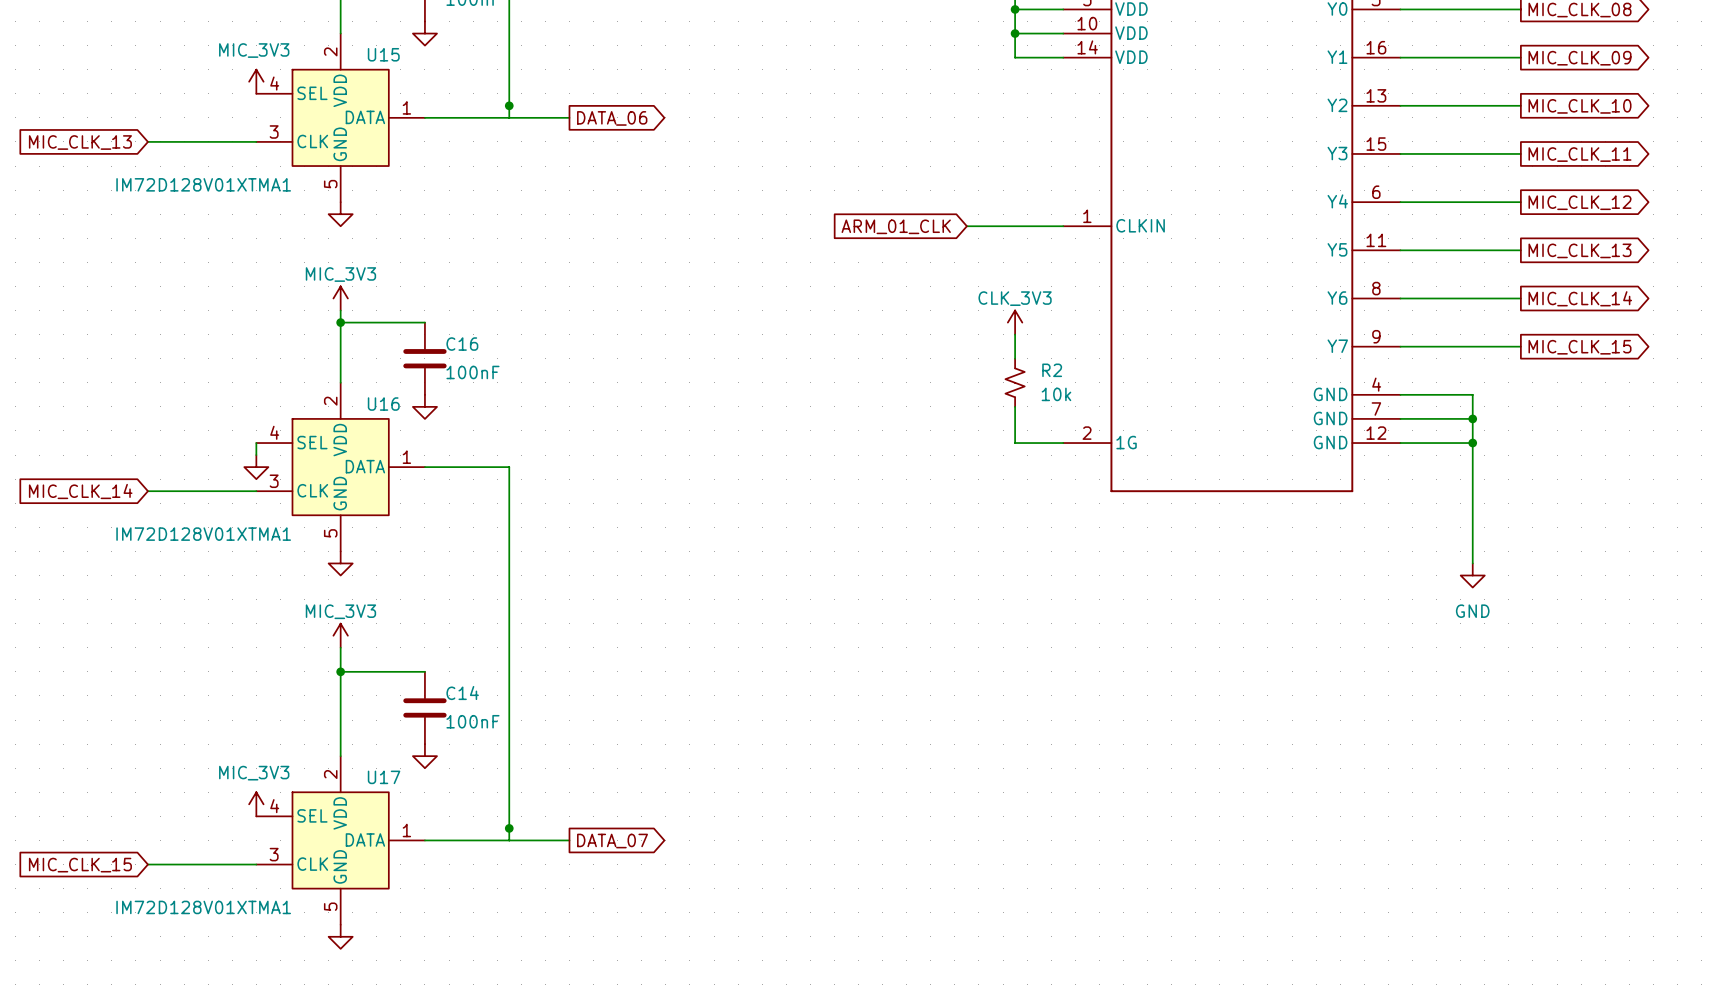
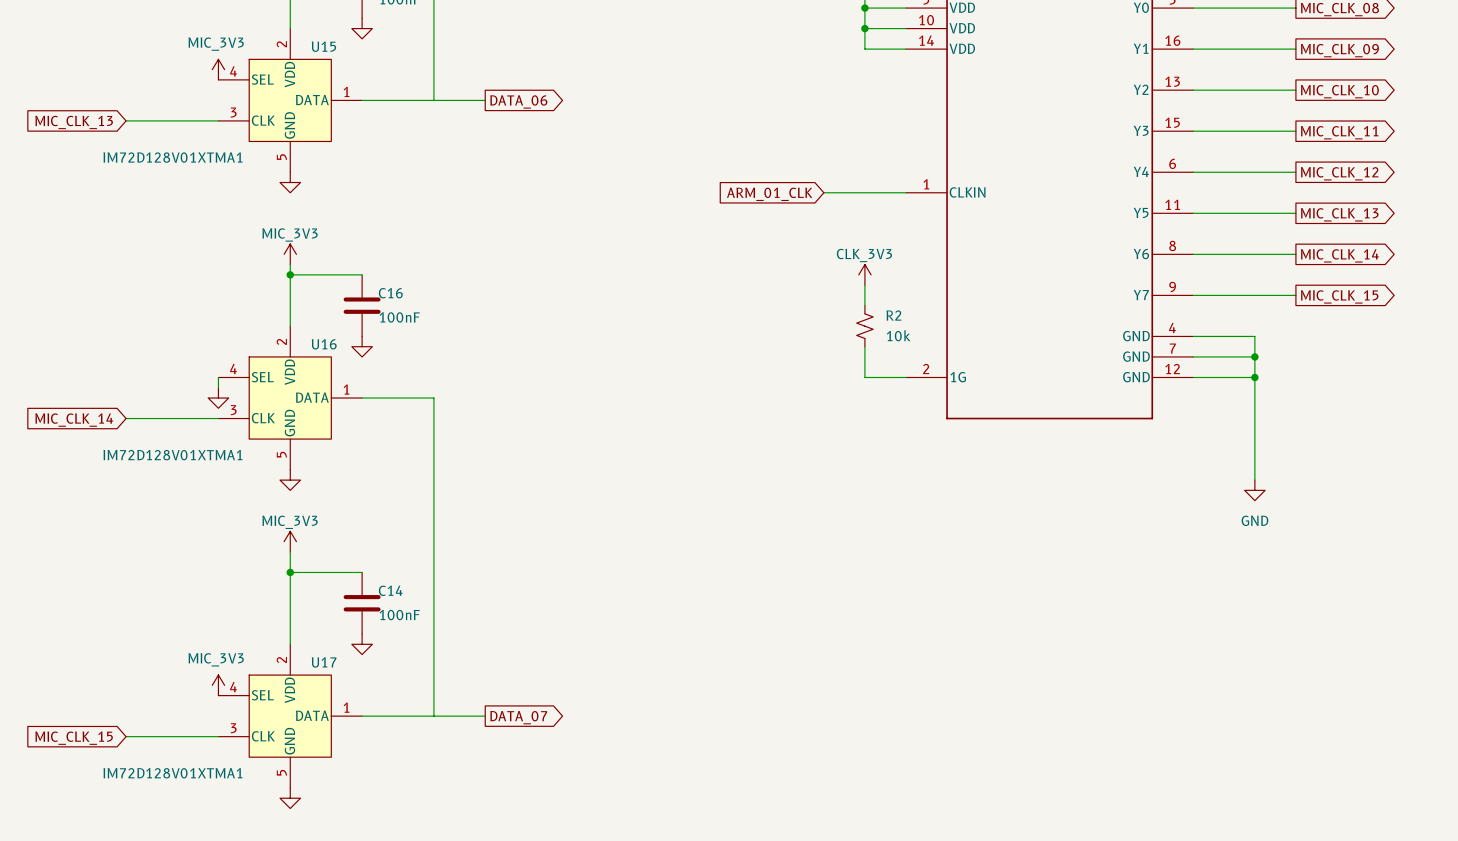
junction: (509, 105) -> none
junction: (509, 828) -> none

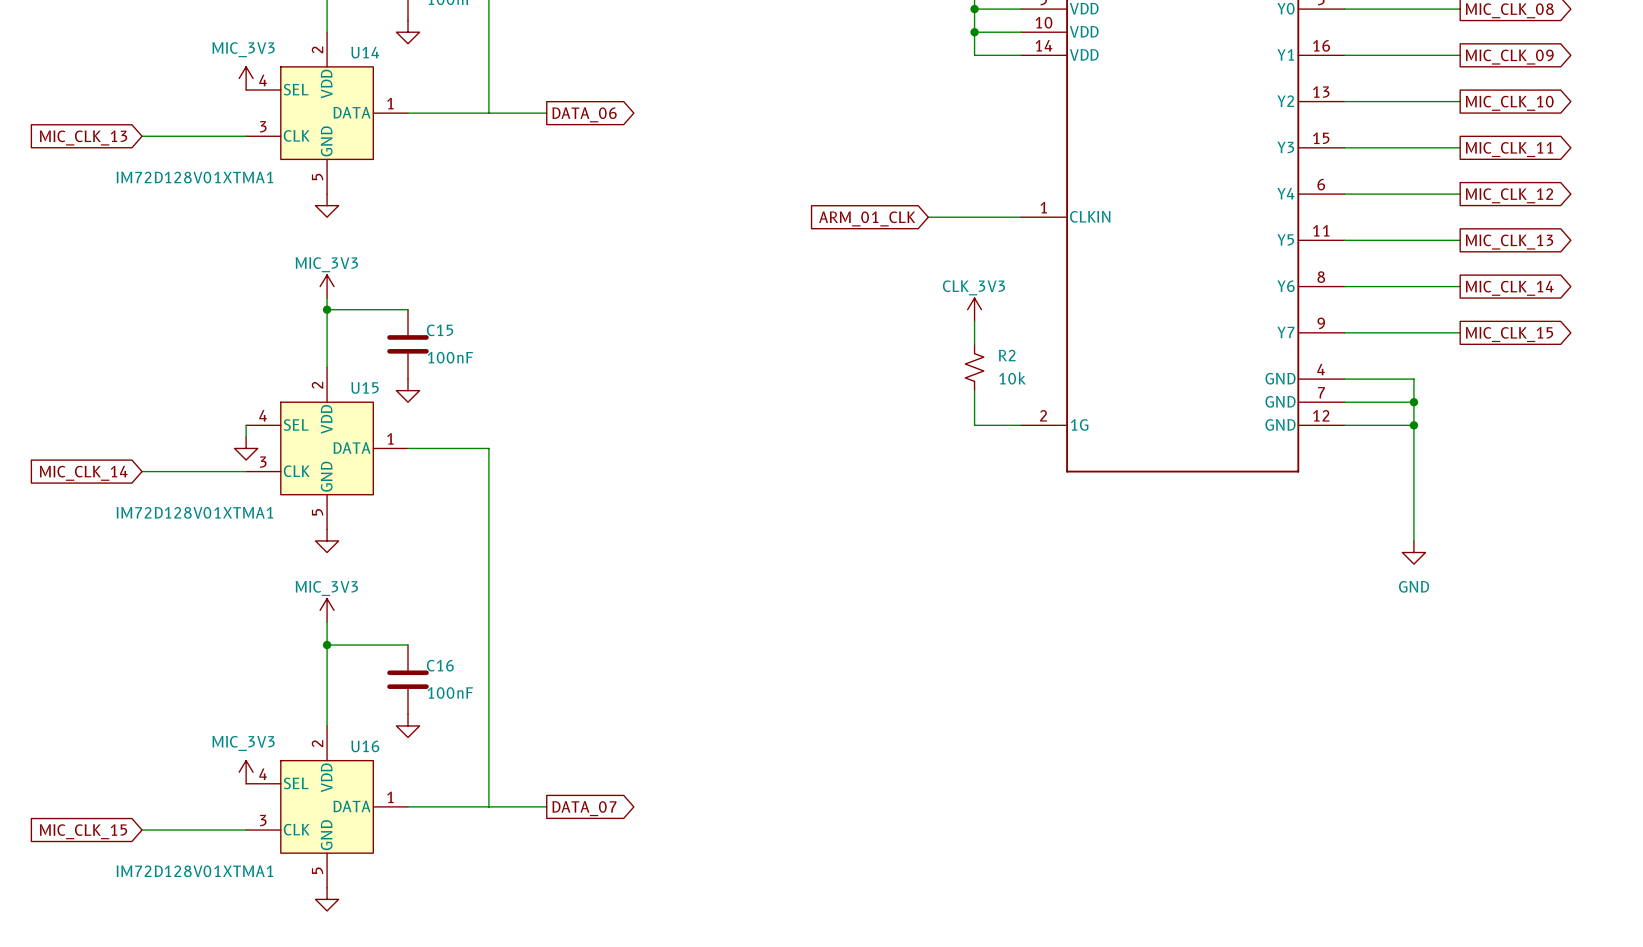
U15 name: U15 (323, 46) -> U14 (365, 52)
C16 name: C16 (390, 293) -> C15 (440, 330)
U16 name: U16 (324, 344) -> U15 (365, 387)
C14 name: C14 (390, 590) -> C16 (440, 665)
U17 name: U17 (324, 662) -> U16 (365, 746)

